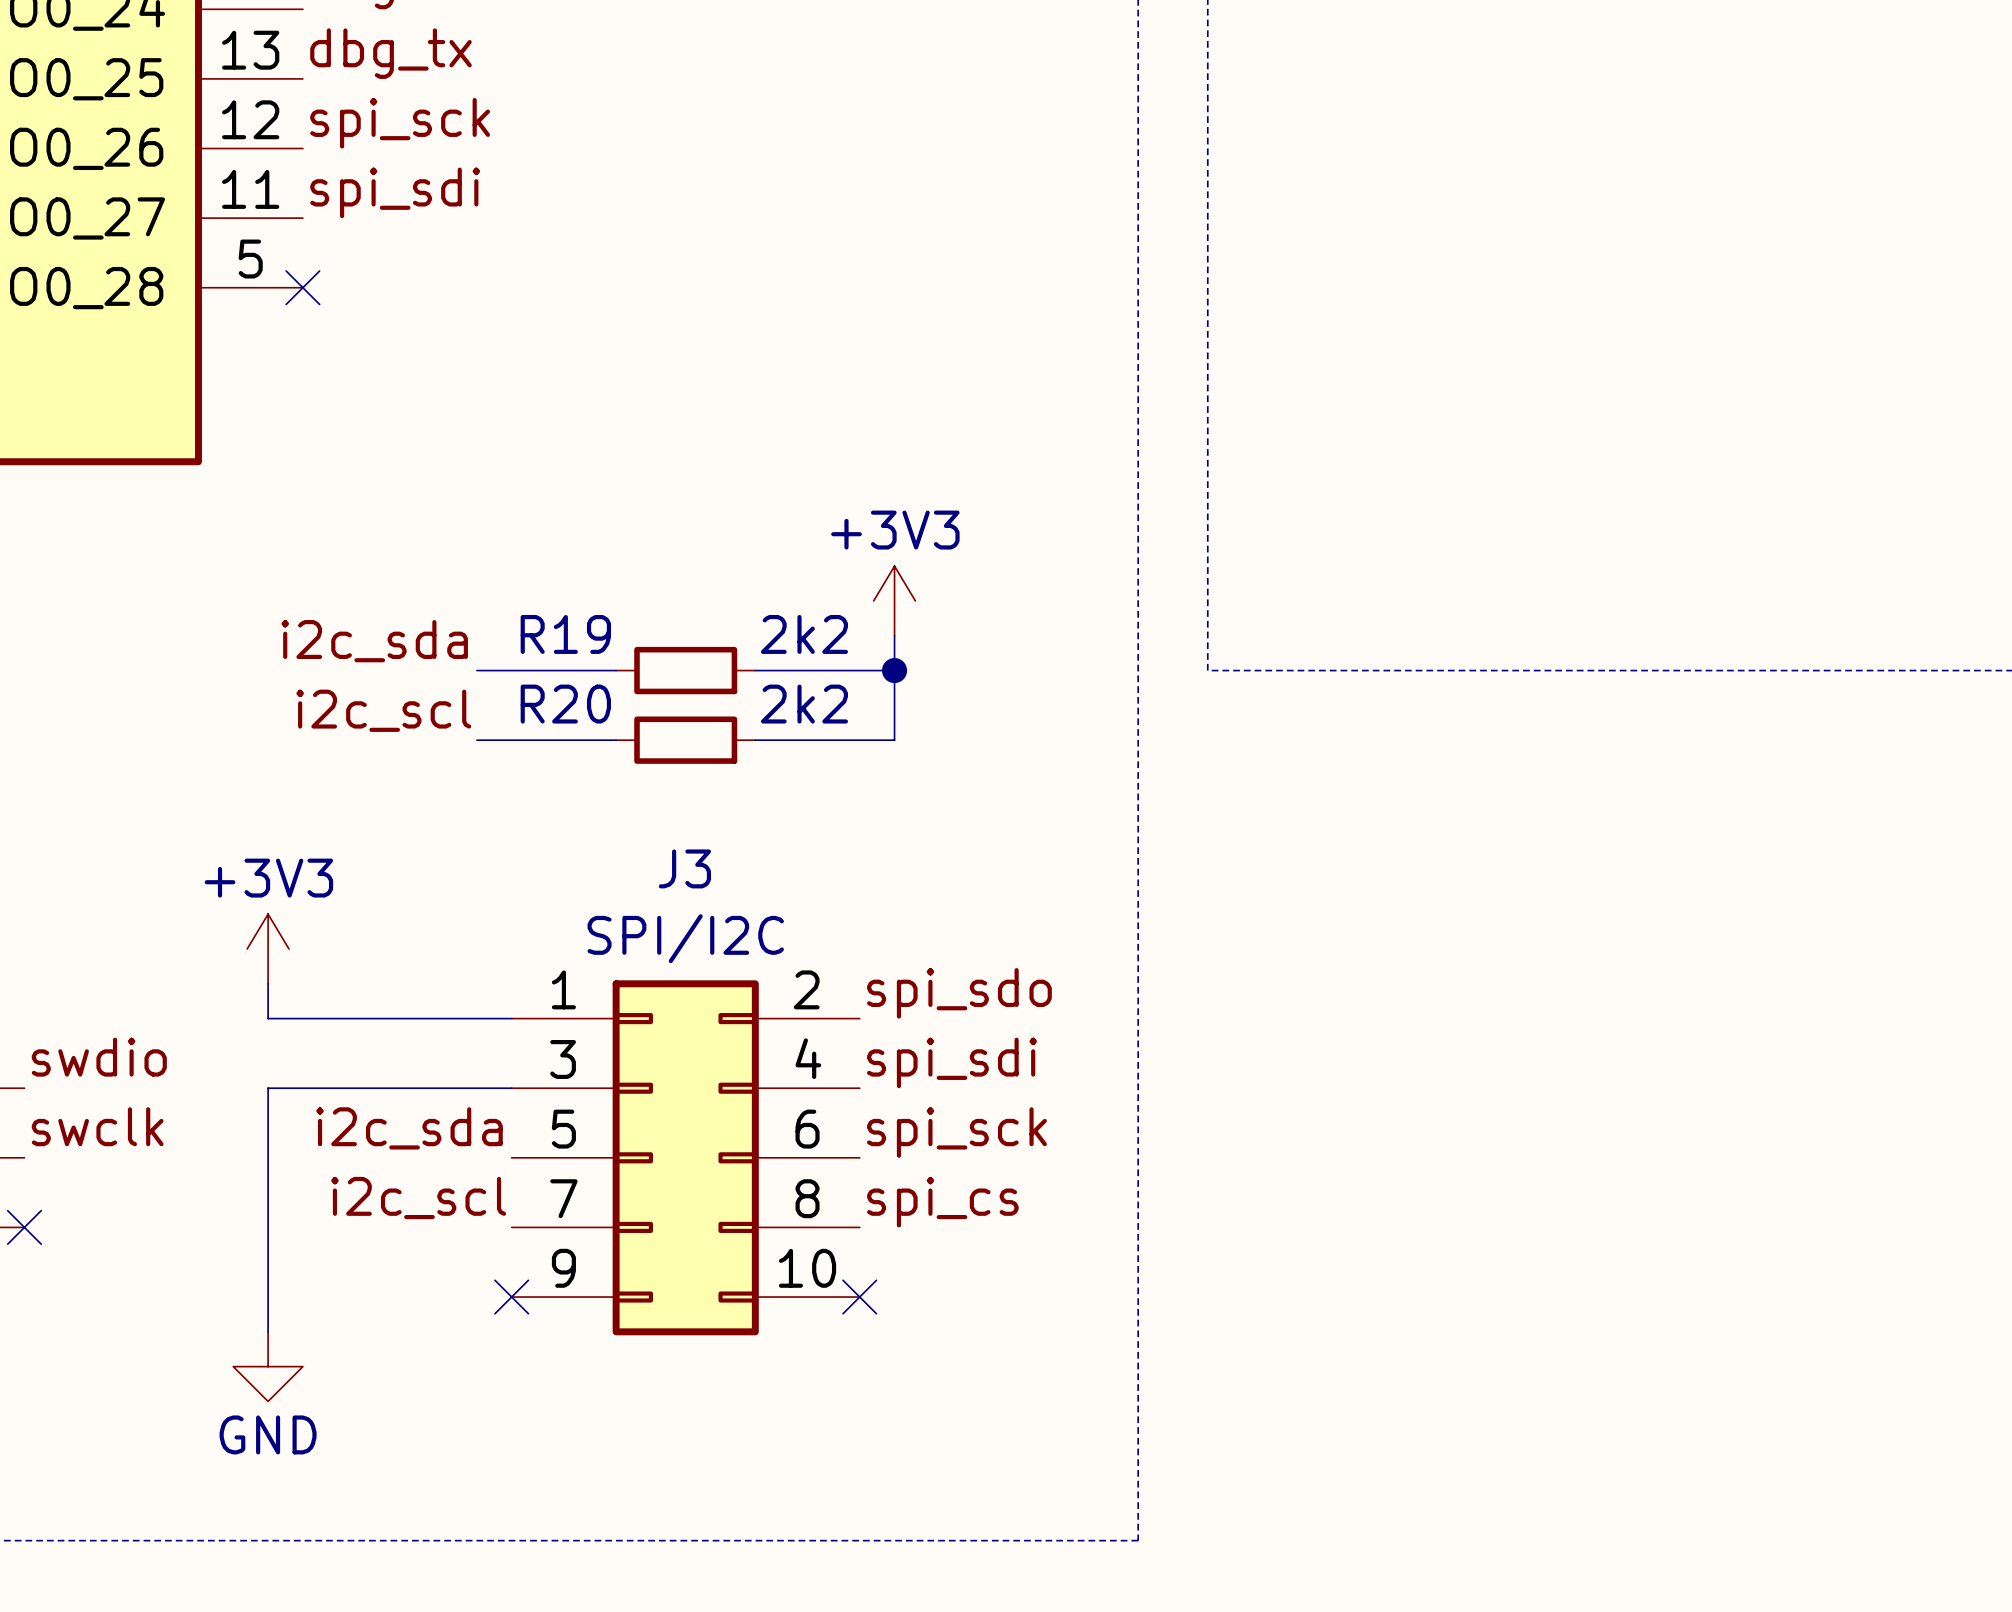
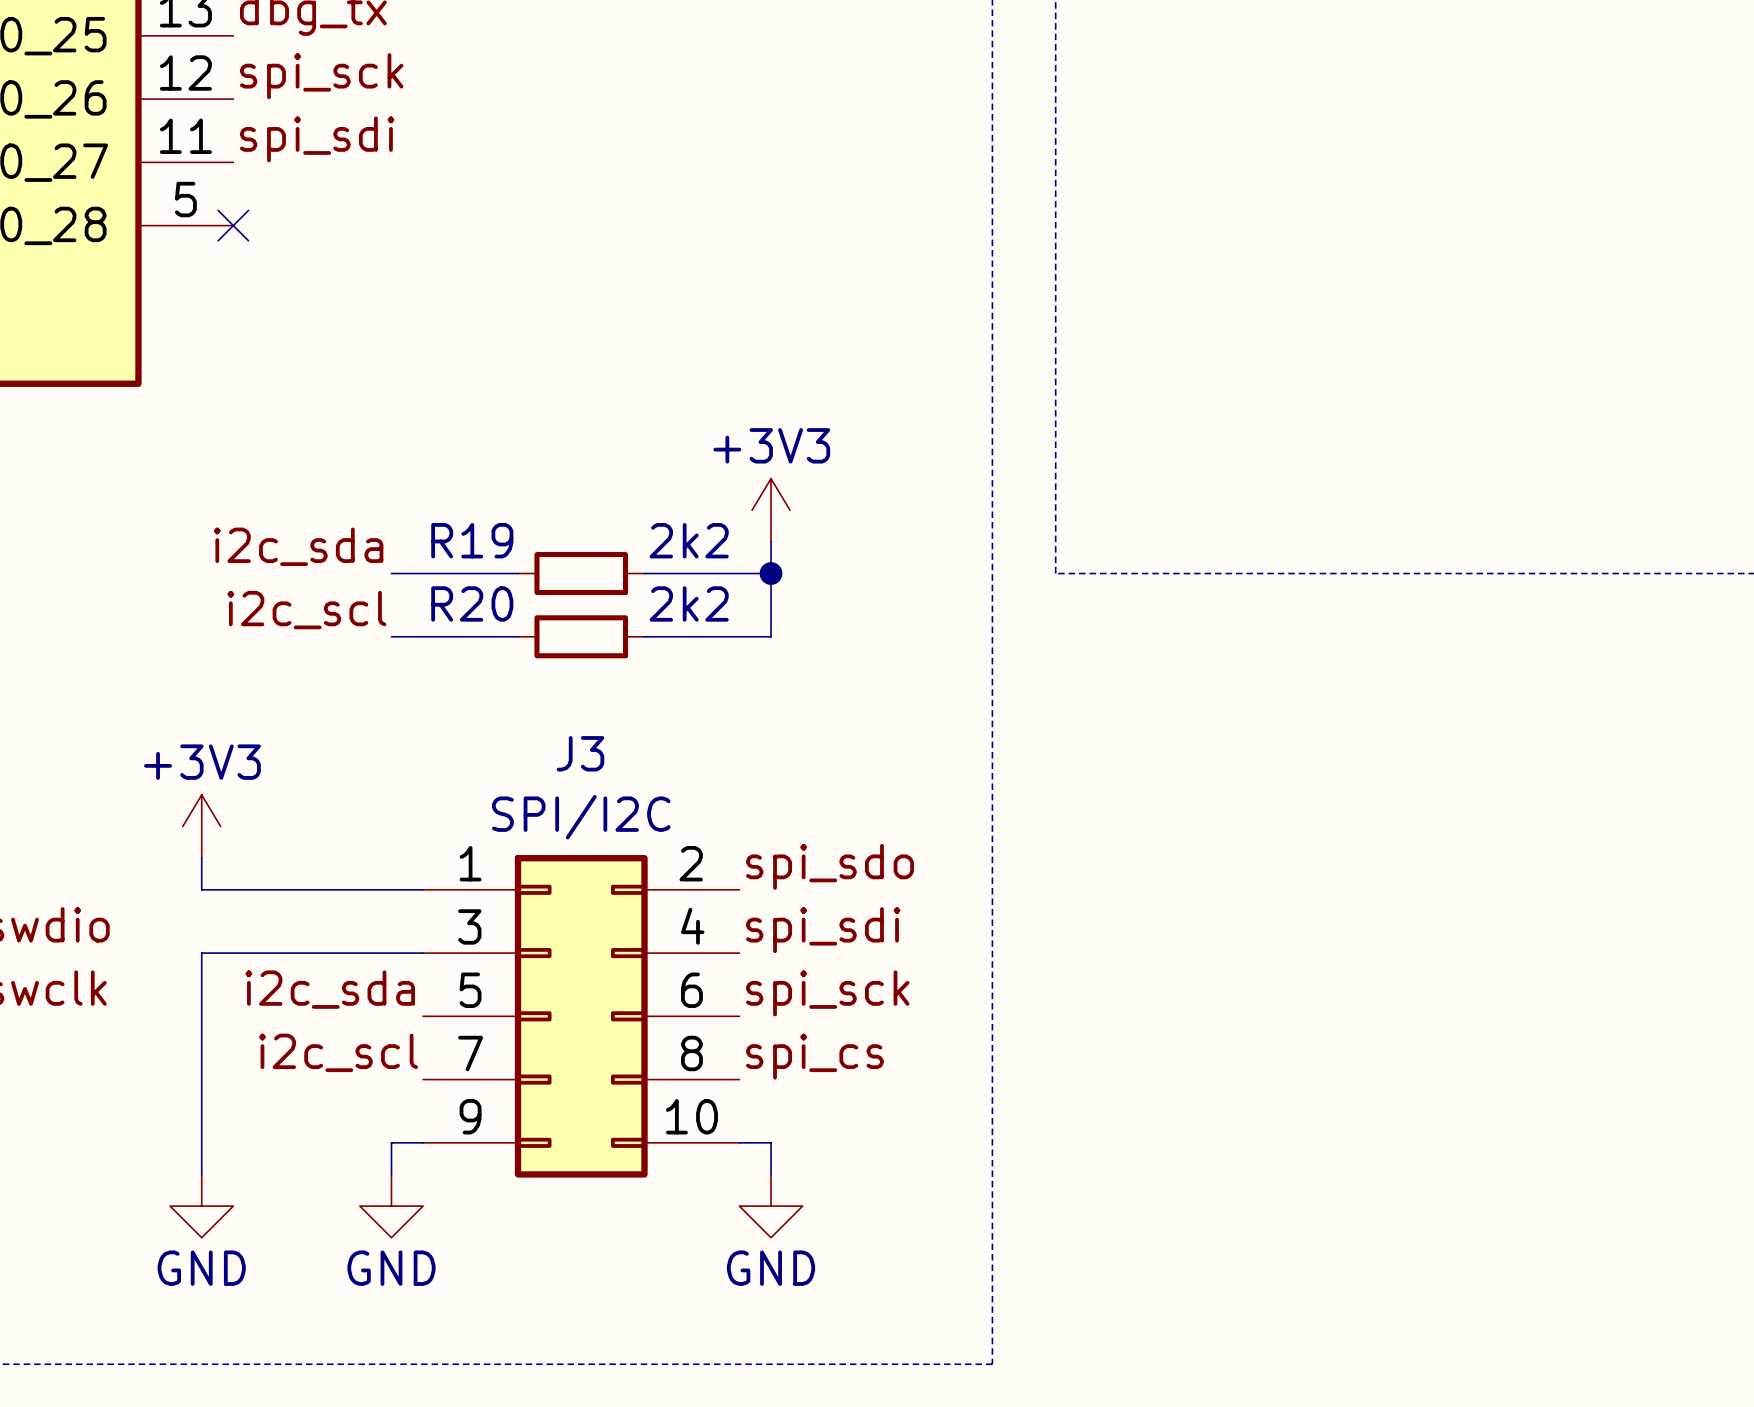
wire: none -> (423, 1142) (391, 1142) (391, 1174)
no-connect mark: (511, 1297) -> none
wire: none -> (739, 1142) (771, 1142) (771, 1174)
no-connect mark: (859, 1297) -> none
power symbol: none -> GND (391, 1206)
power symbol: none -> GND (771, 1206)

